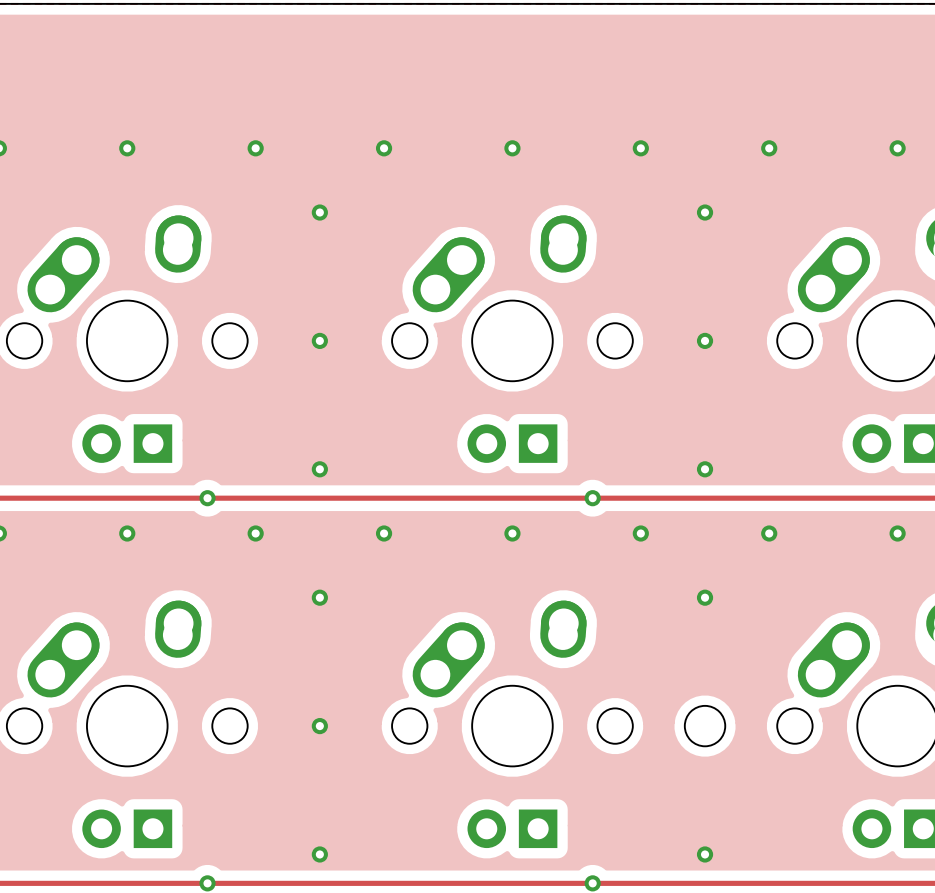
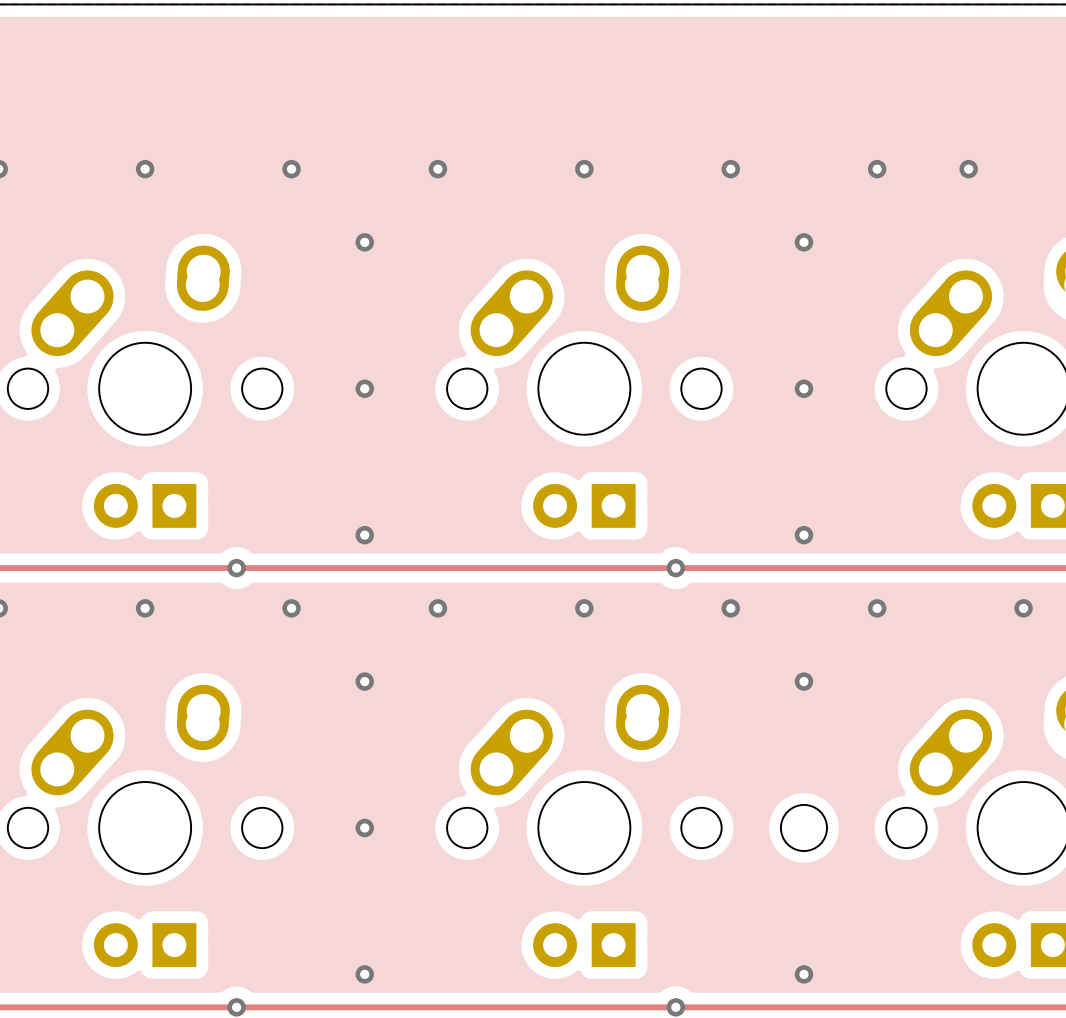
via position: (897, 148) -> (968, 169)

